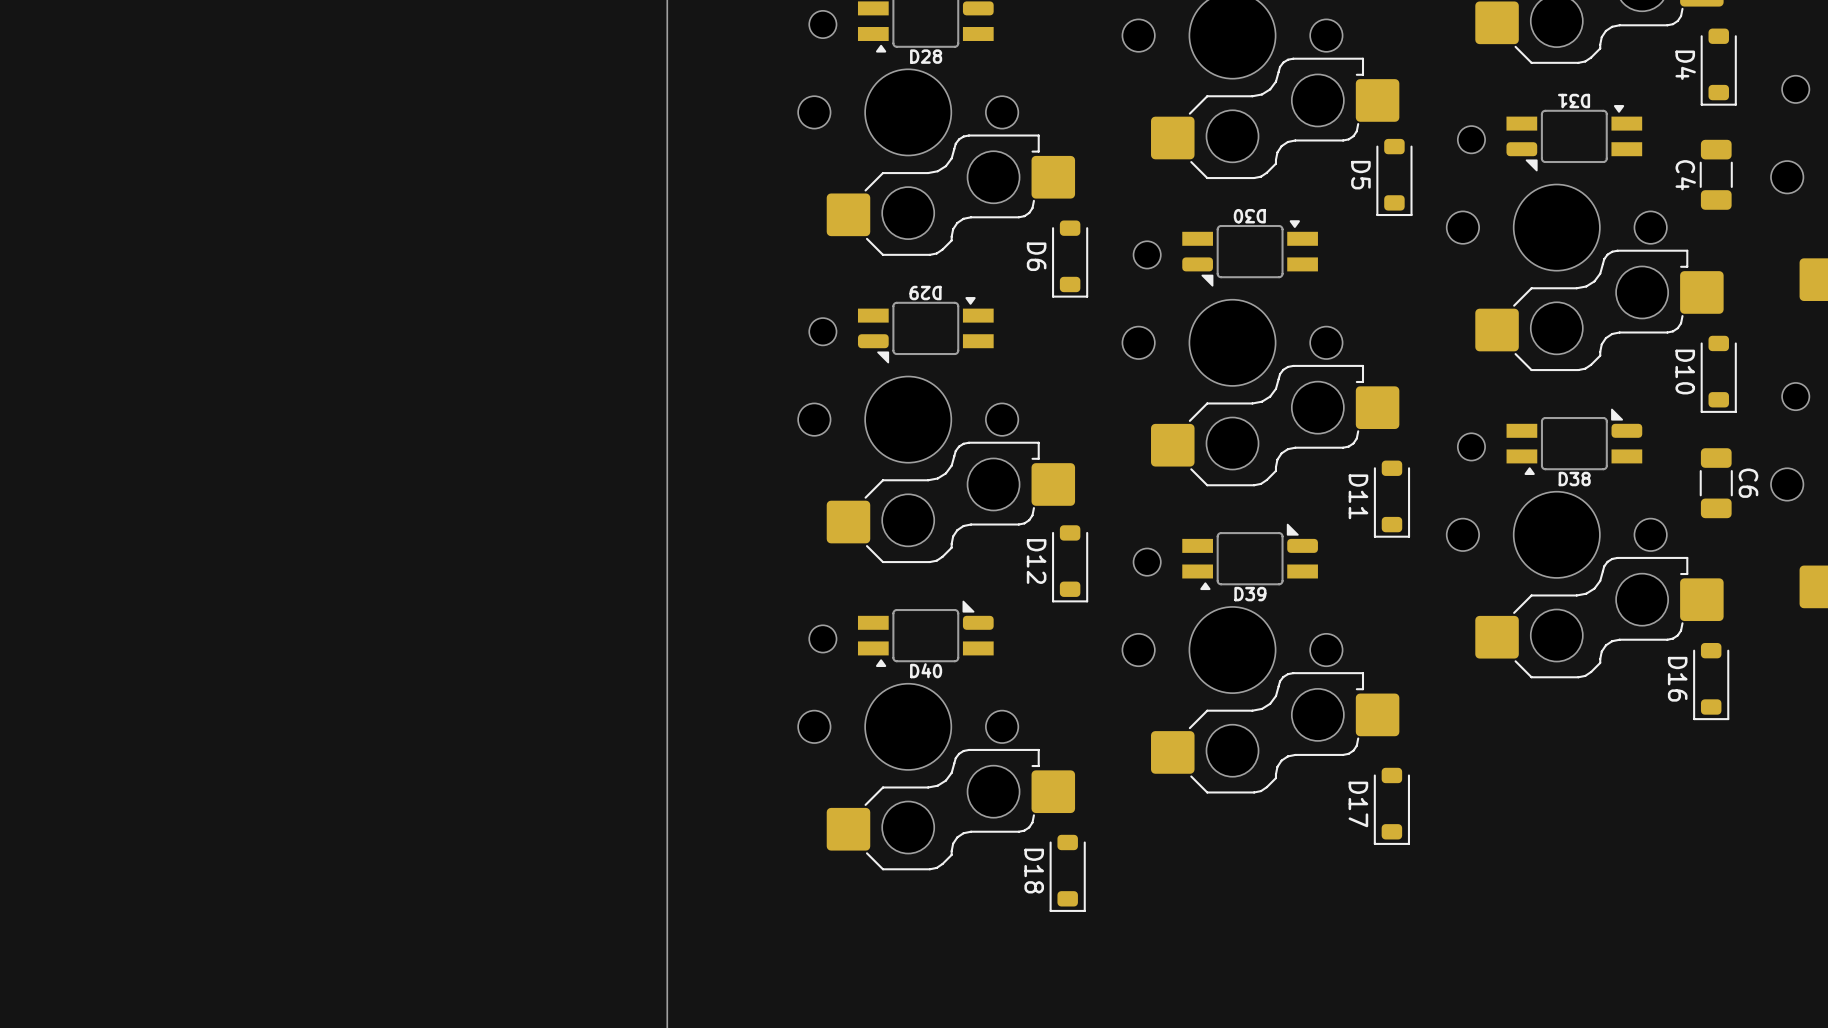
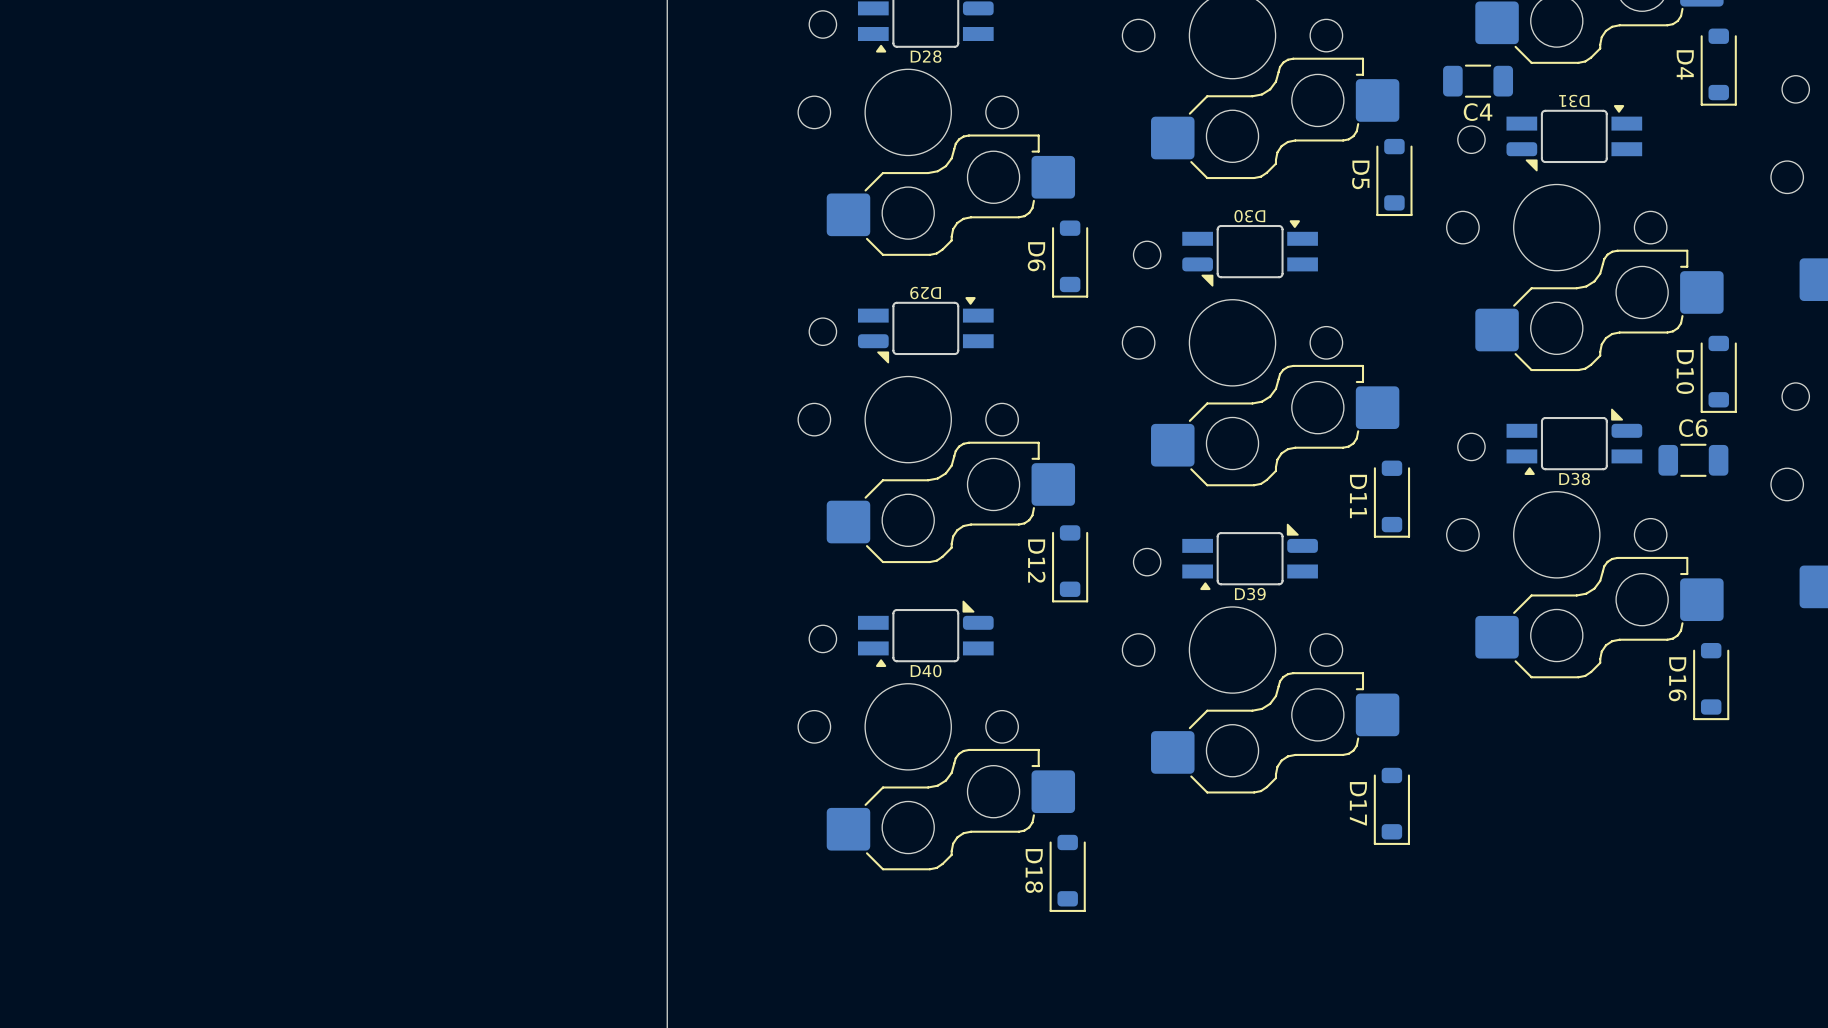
C4 rotation: 0° (1716, 174) -> 90° clockwise (1478, 81)
C4 position: (1716, 174) -> (1478, 81)
C4 name position: C4 (1685, 175) -> C4 (1478, 112)
C6 rotation: 0° (1716, 483) -> 90° clockwise (1693, 460)
C6 name position: C6 (1748, 483) -> C6 (1693, 428)

